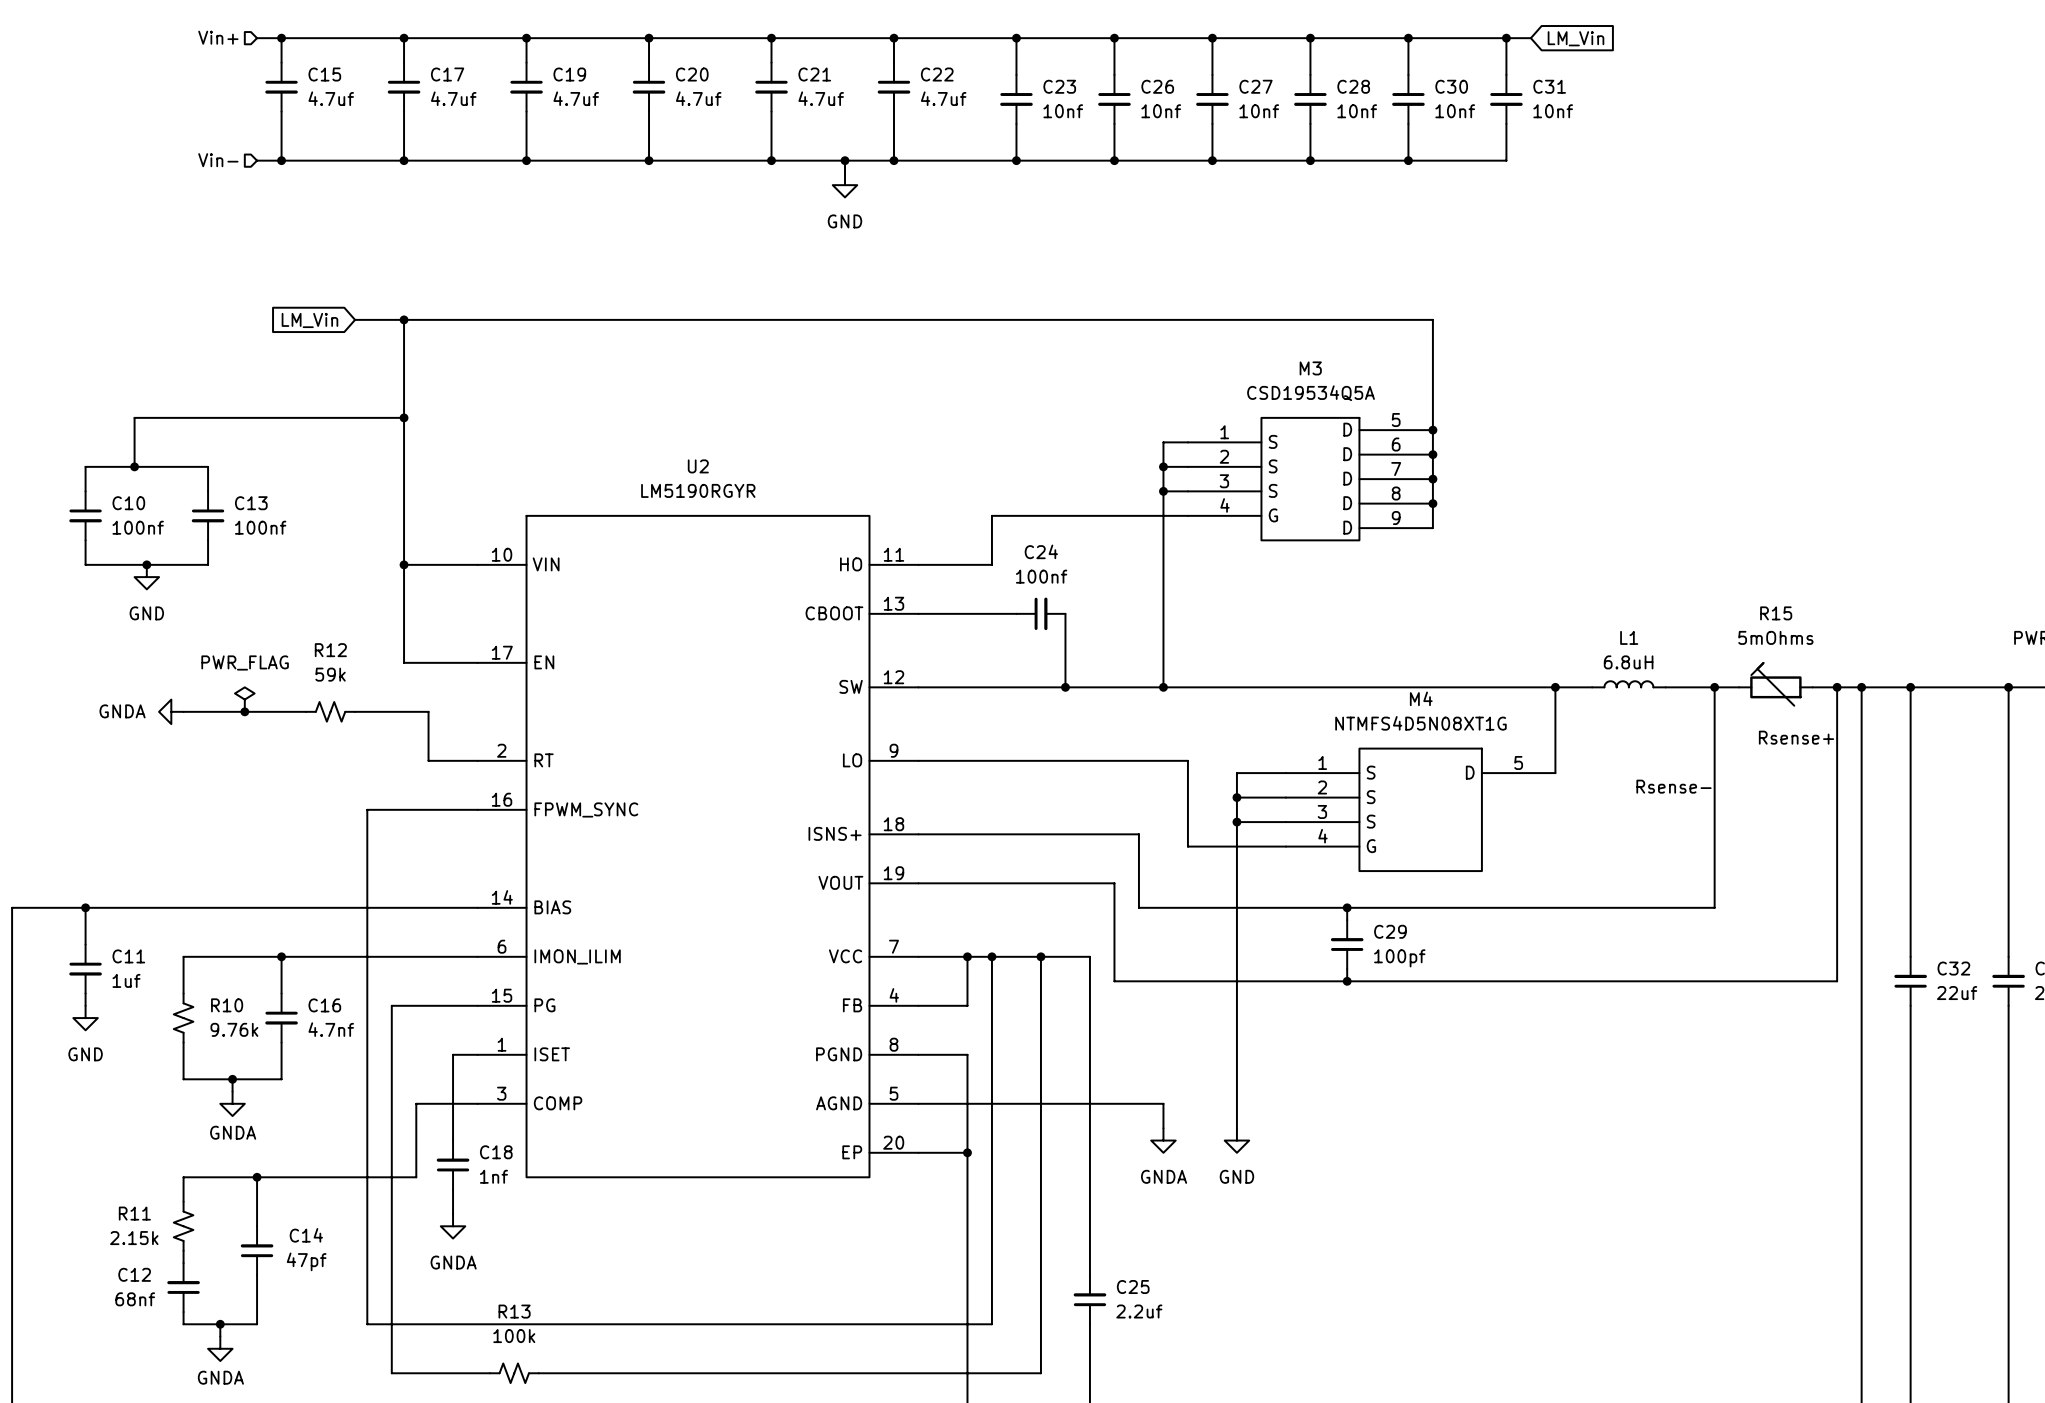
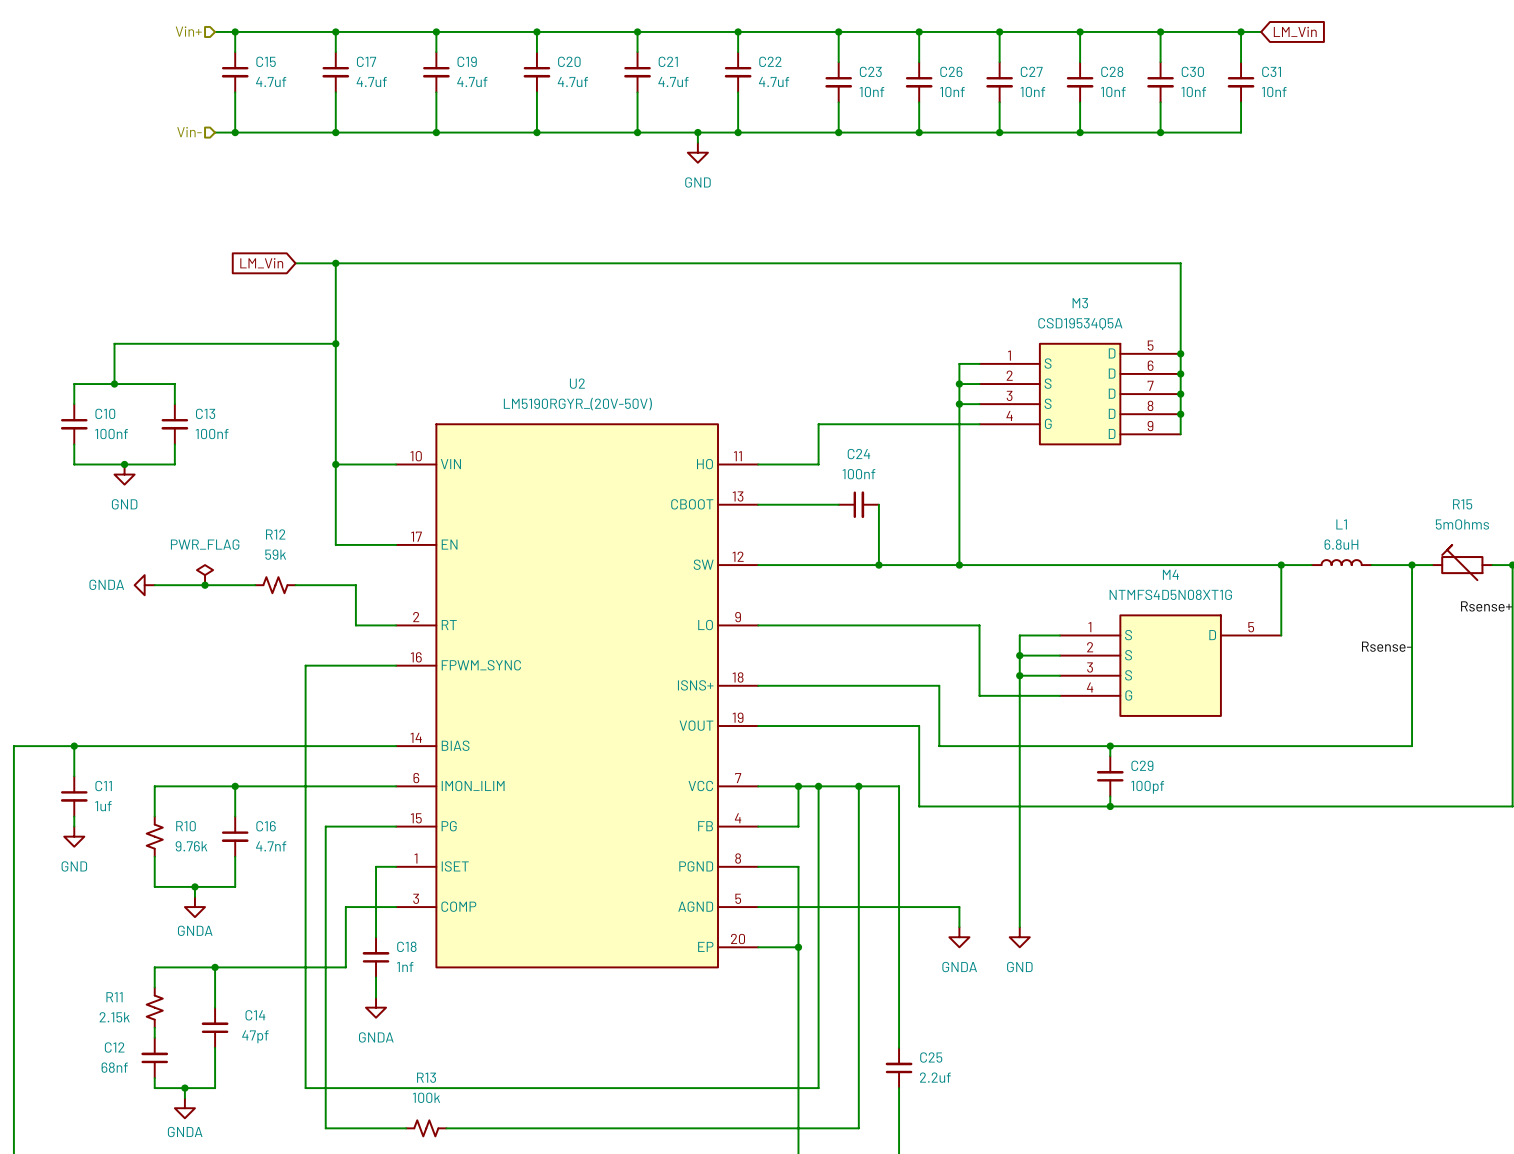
U2 value: LM5190RGYR (698, 490) -> LM5190RGYR_(20V-50V) (577, 404)

